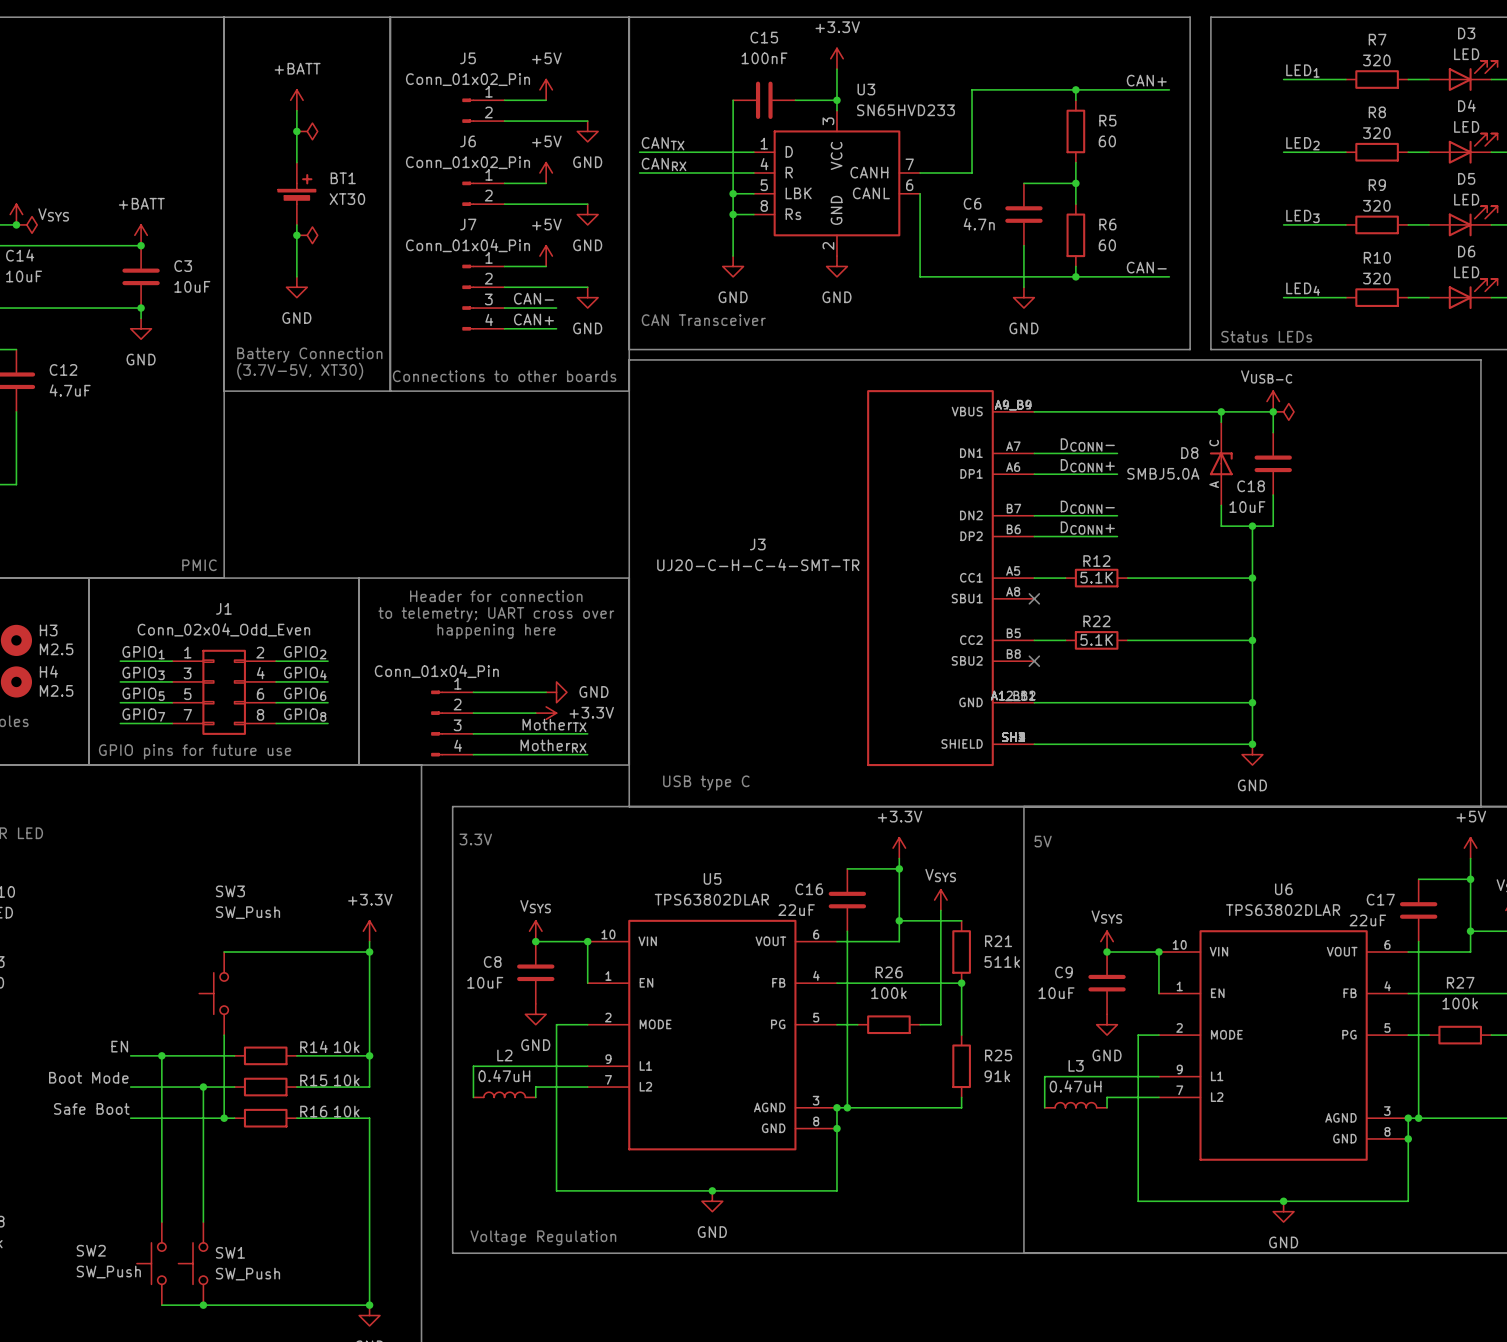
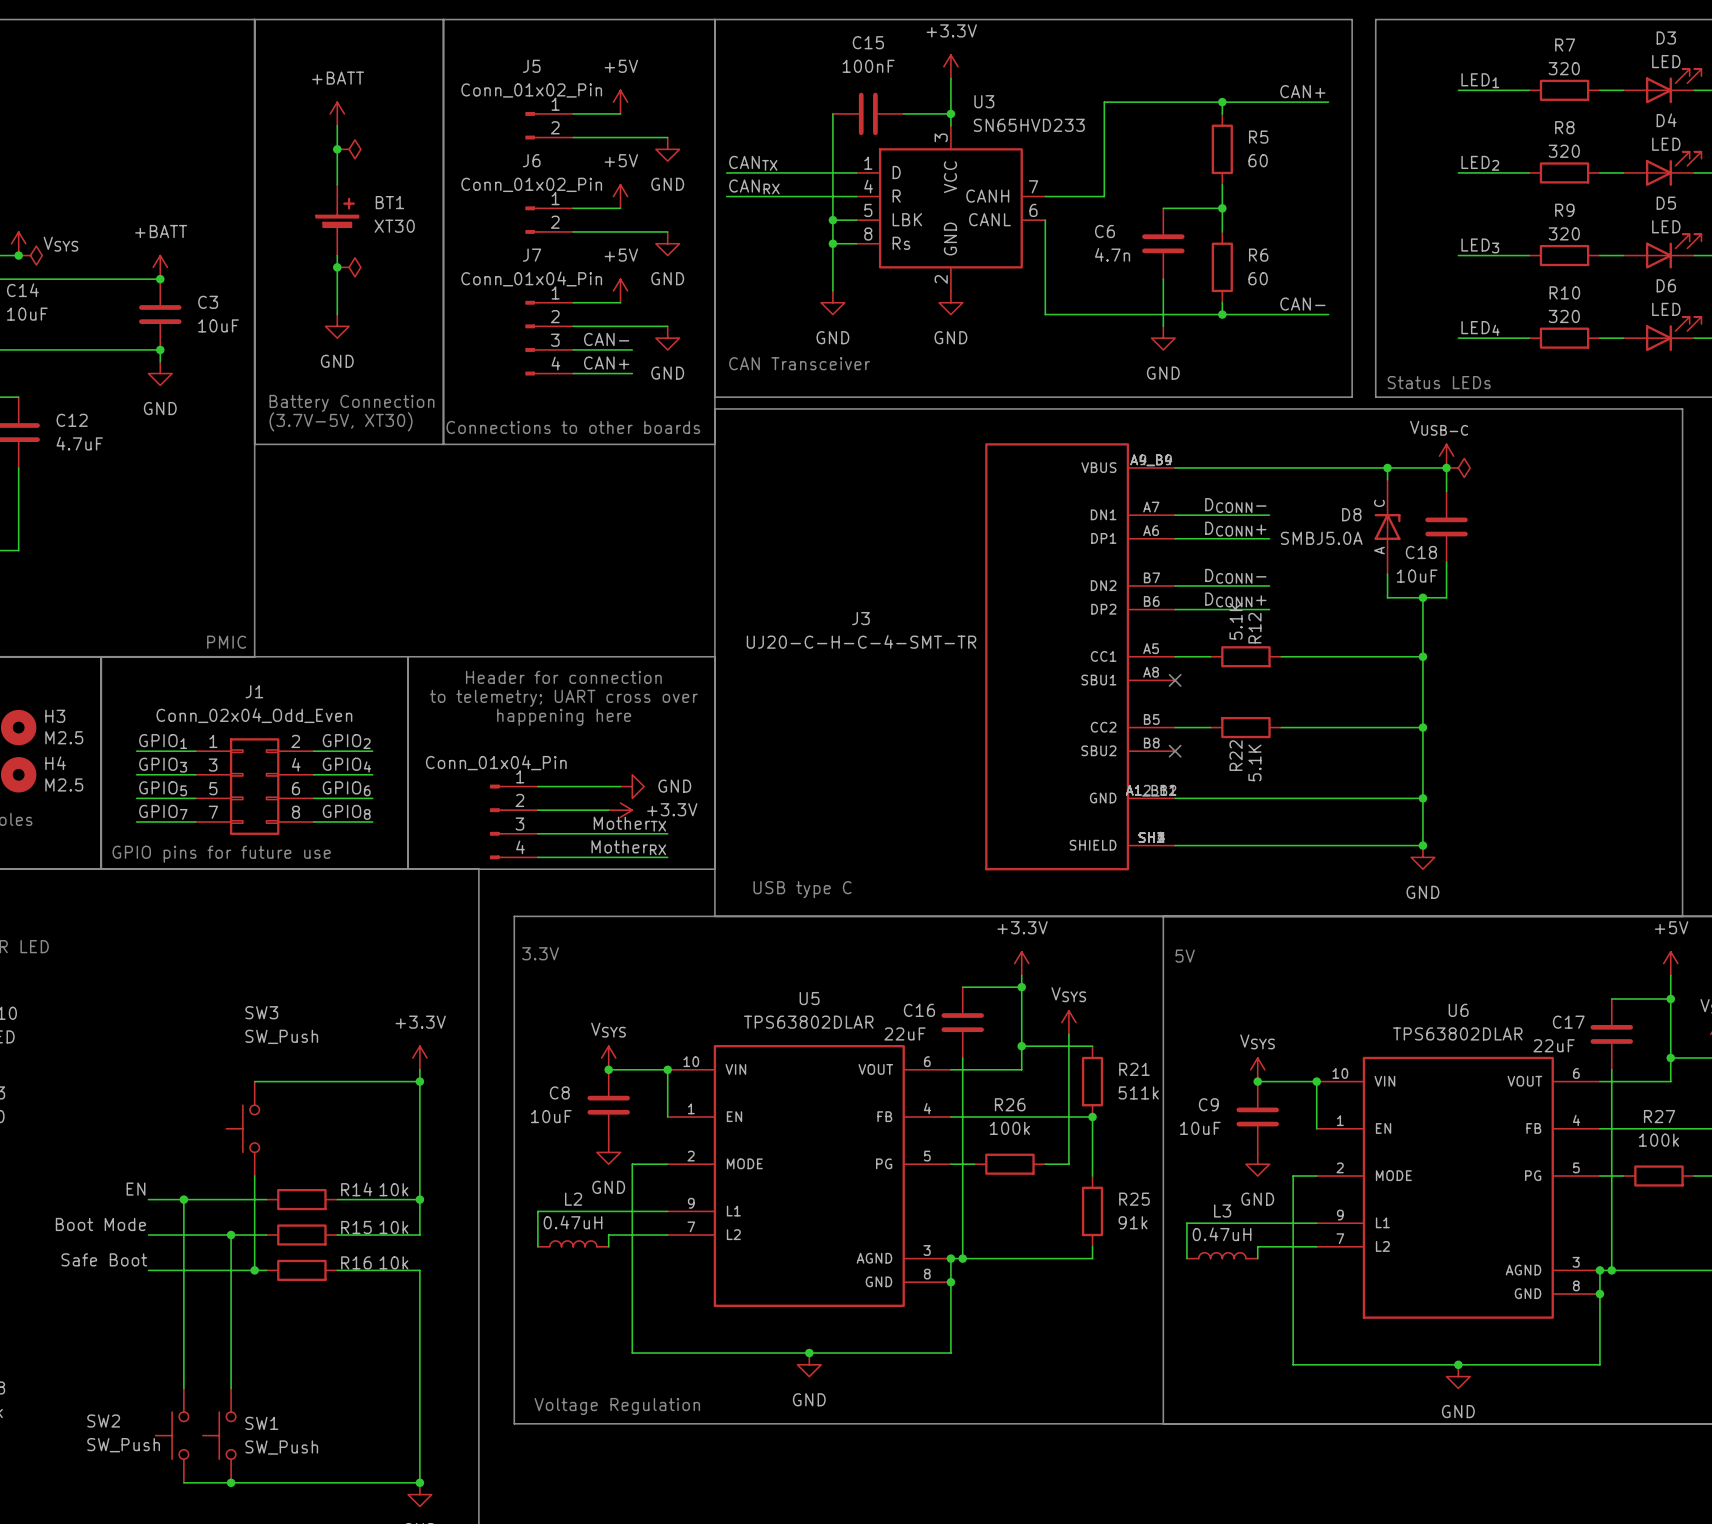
R12 name rotation: 0° (1096, 561) -> 90° counterclockwise (1254, 628)
R12 value rotation: 0° (1096, 577) -> 90° counterclockwise (1236, 621)
R22 name rotation: 0° (1096, 621) -> 90° counterclockwise (1236, 755)
R22 name position: R22 (1096, 621) -> R22 (1236, 755)
R22 value rotation: 0° (1096, 640) -> 90° counterclockwise (1254, 762)

